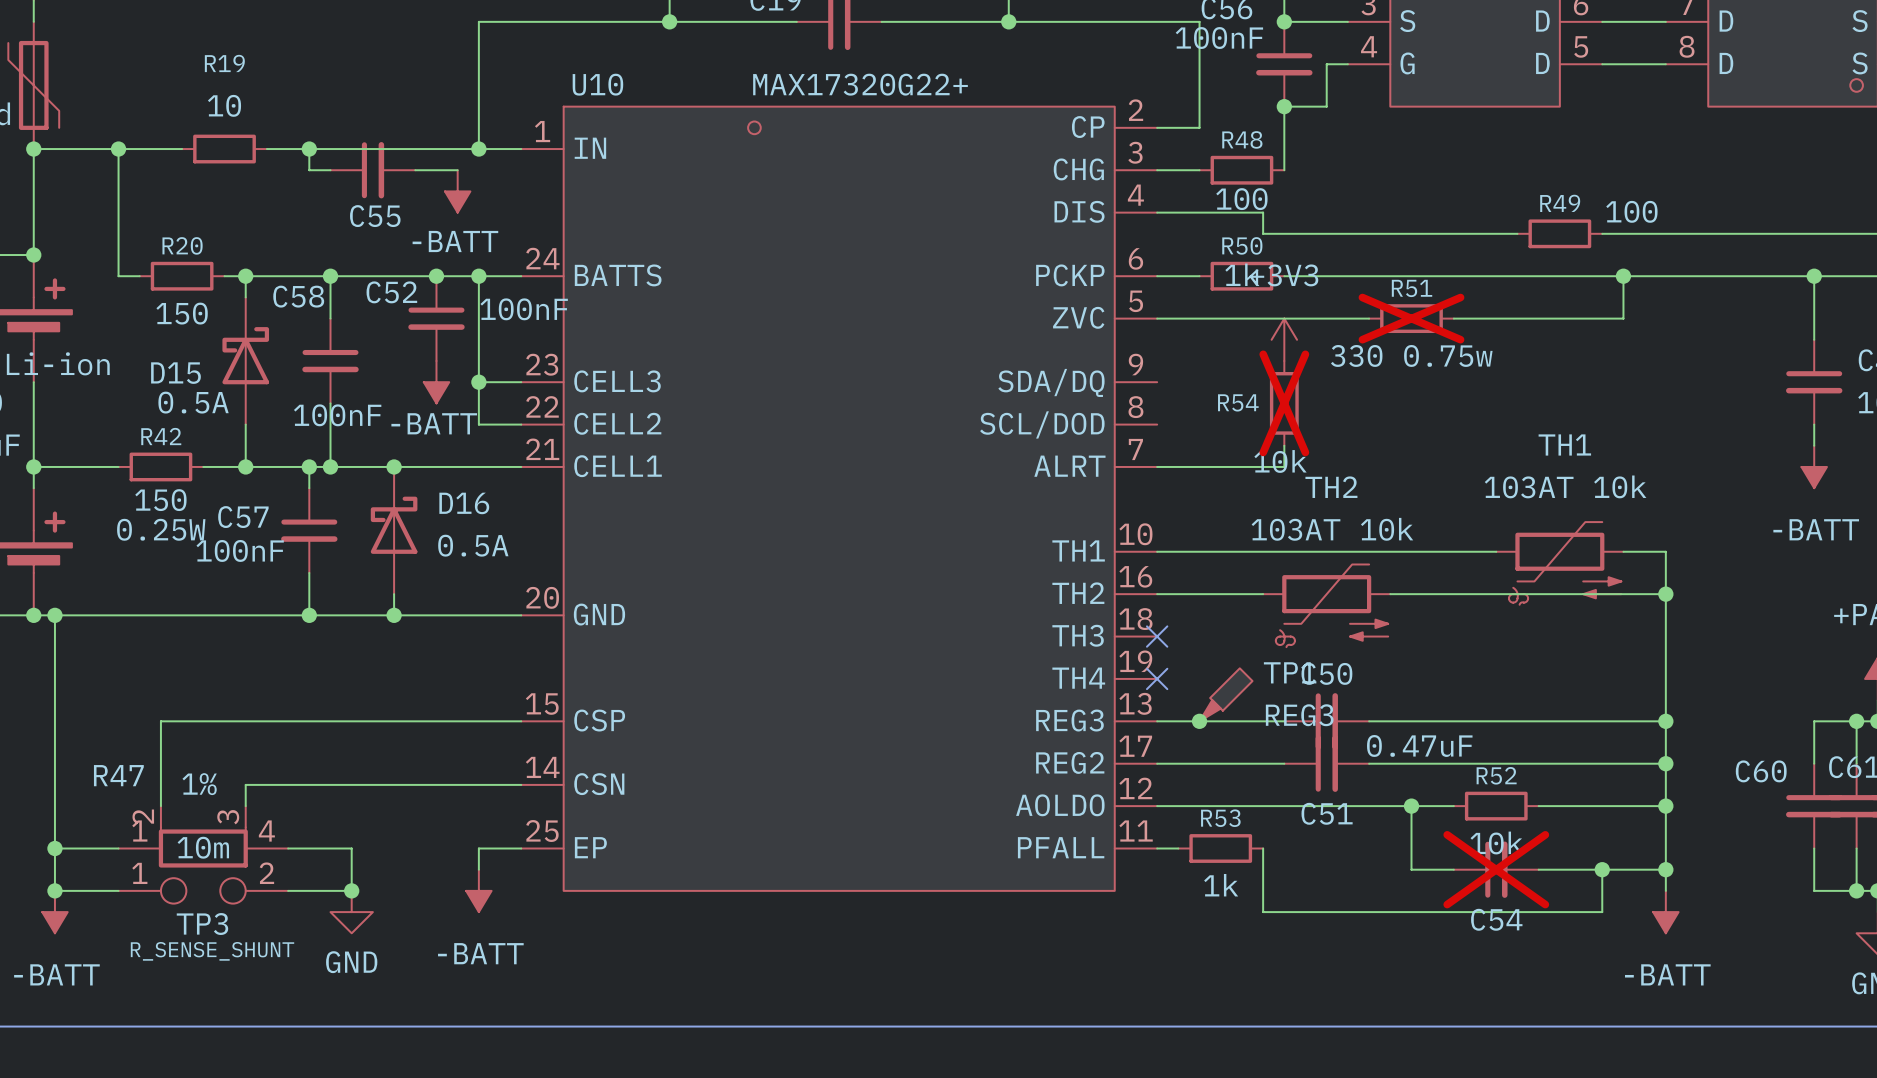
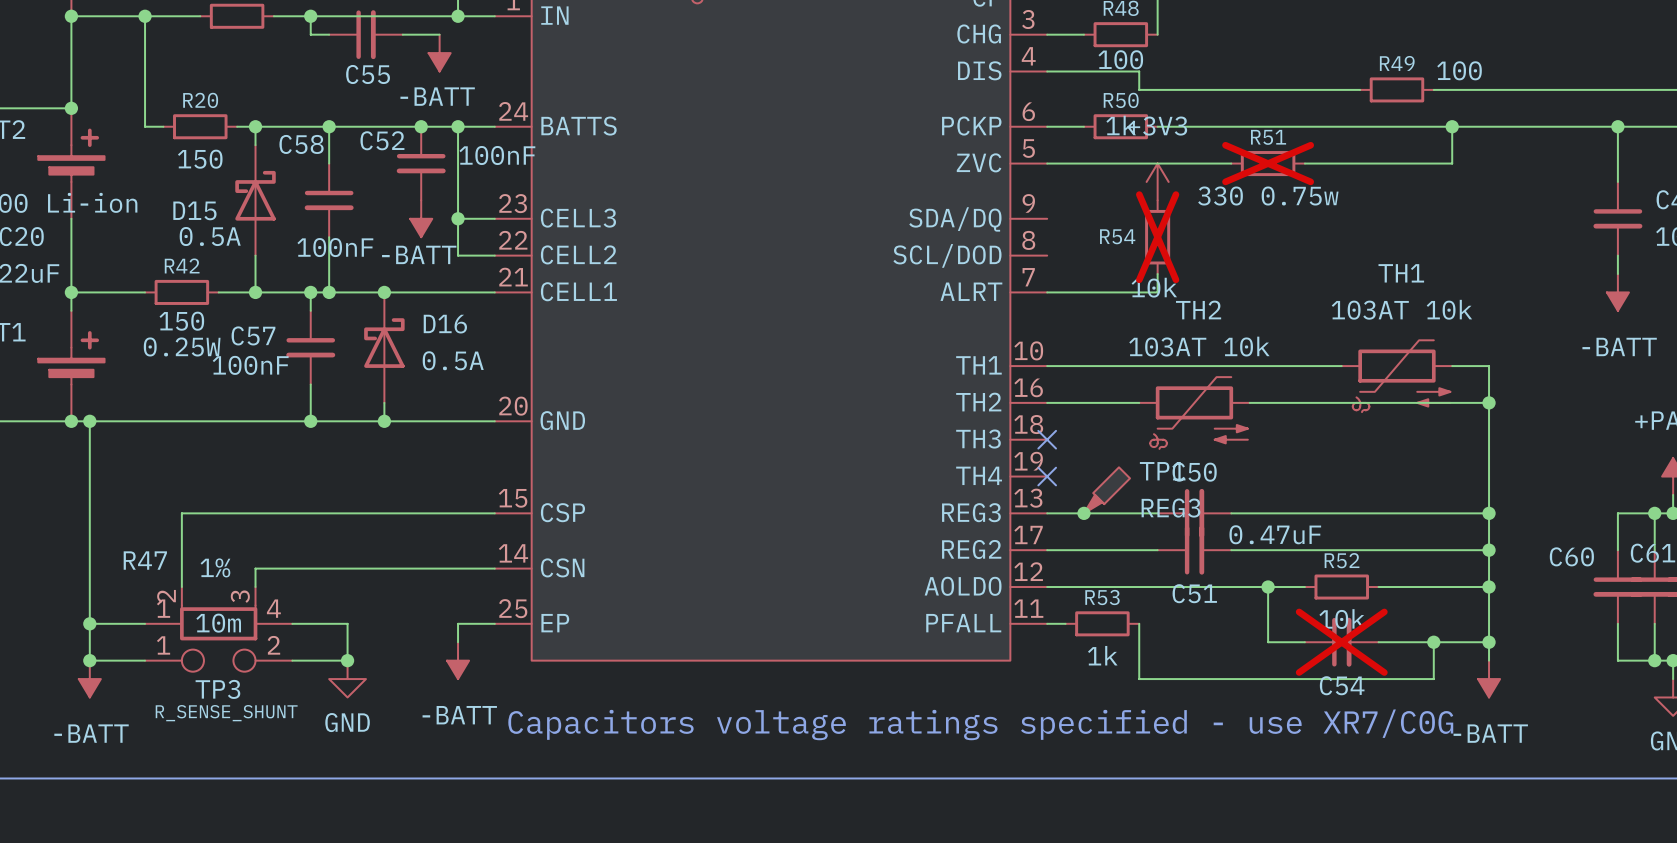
text: none -> Capacitors voltage ratings specified - use XR7/C0G (980, 724)

